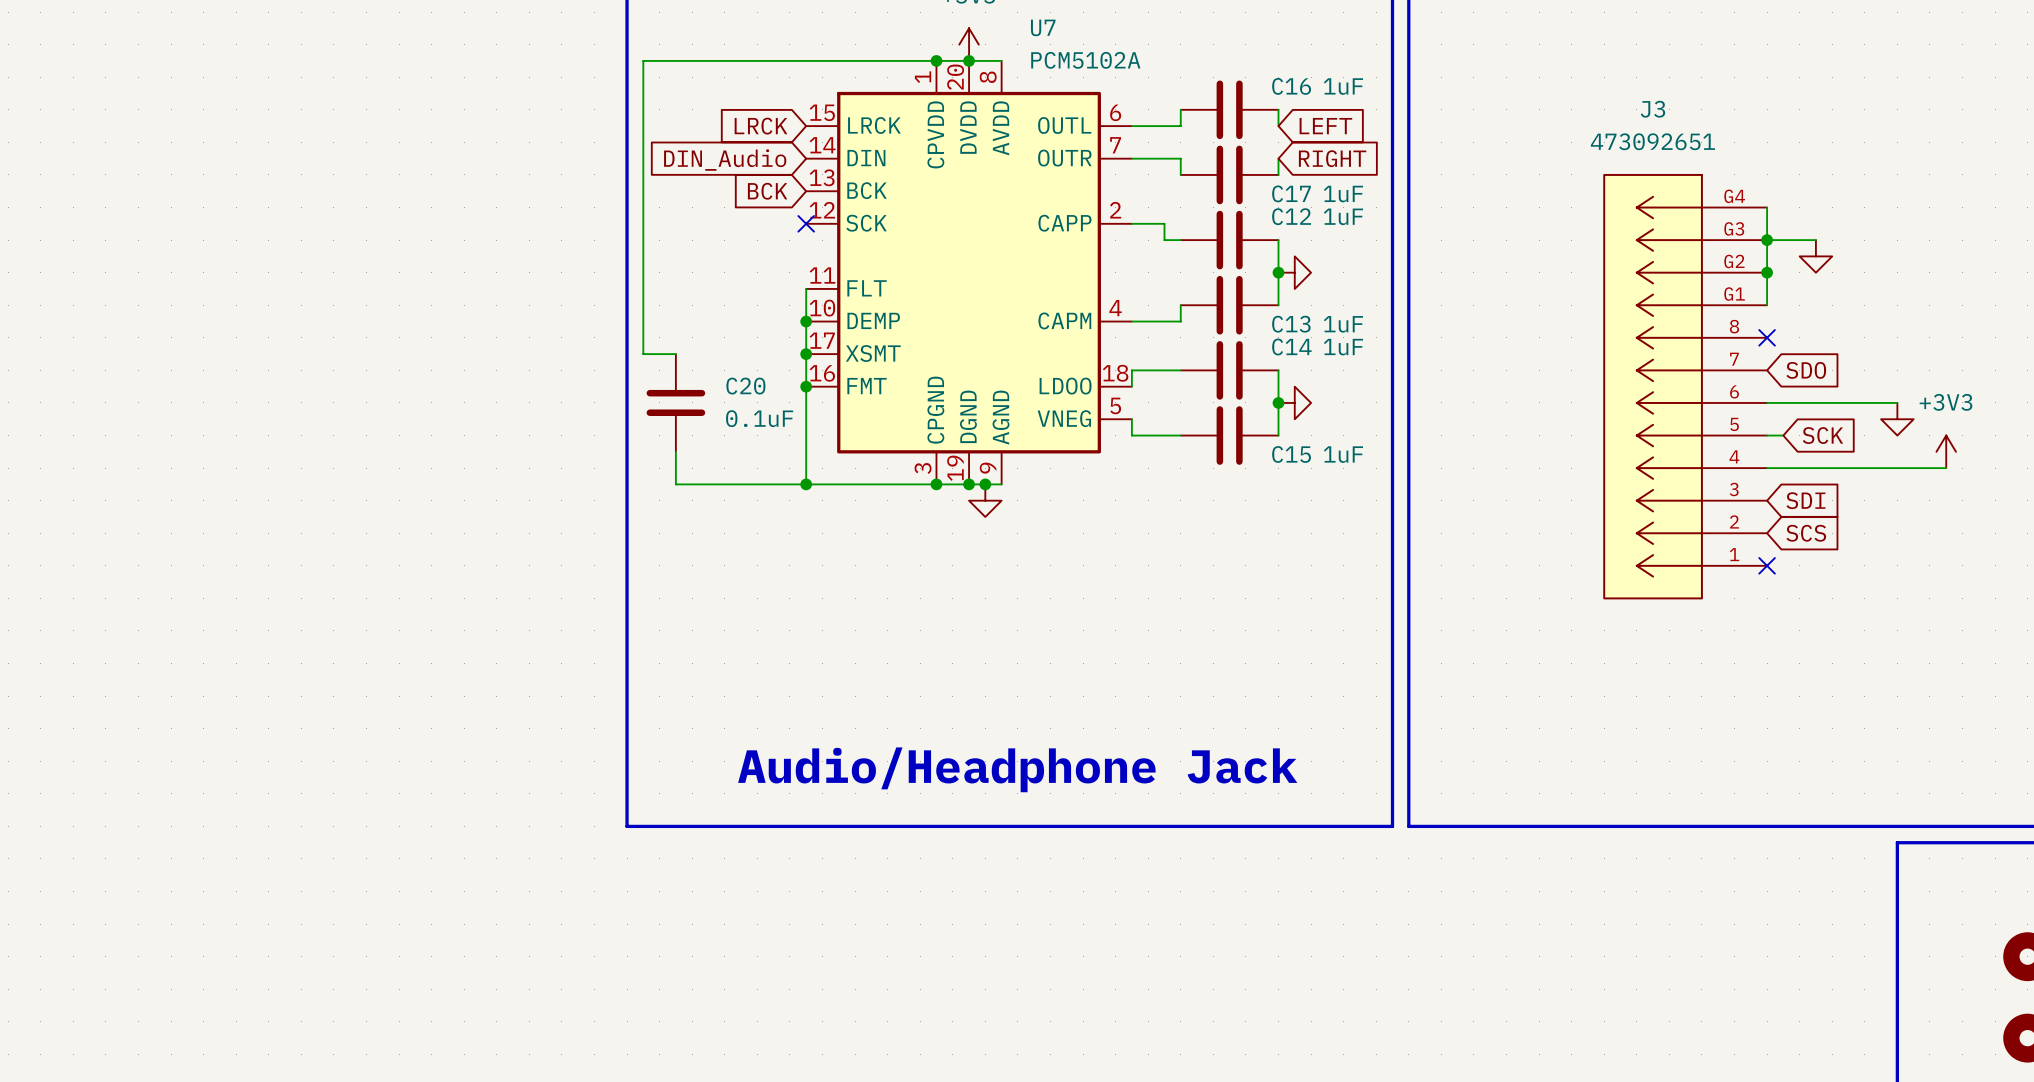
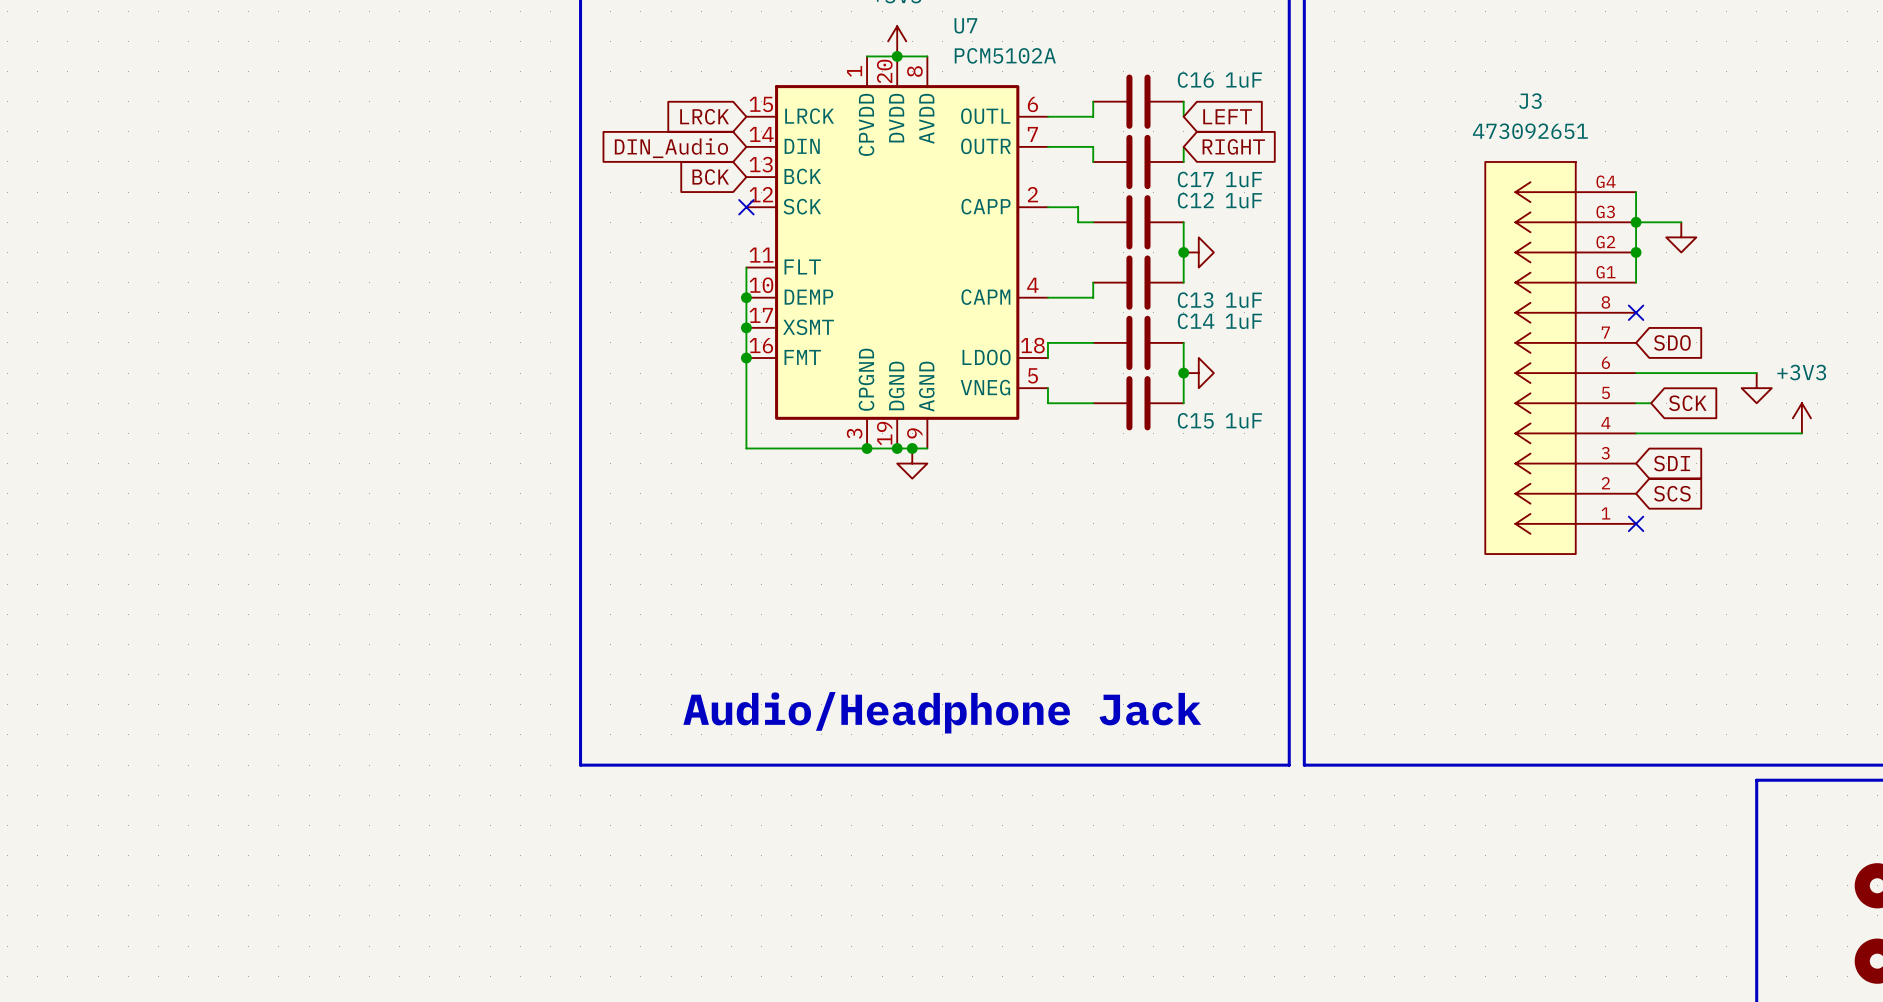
wire: (936, 60) (643, 60) (643, 354) (675, 354) -> none
junction: (936, 60) -> none
C20: 0.1uF (675, 402) -> none
wire: (675, 451) (675, 484) (806, 484) -> none
junction: (806, 484) -> none

